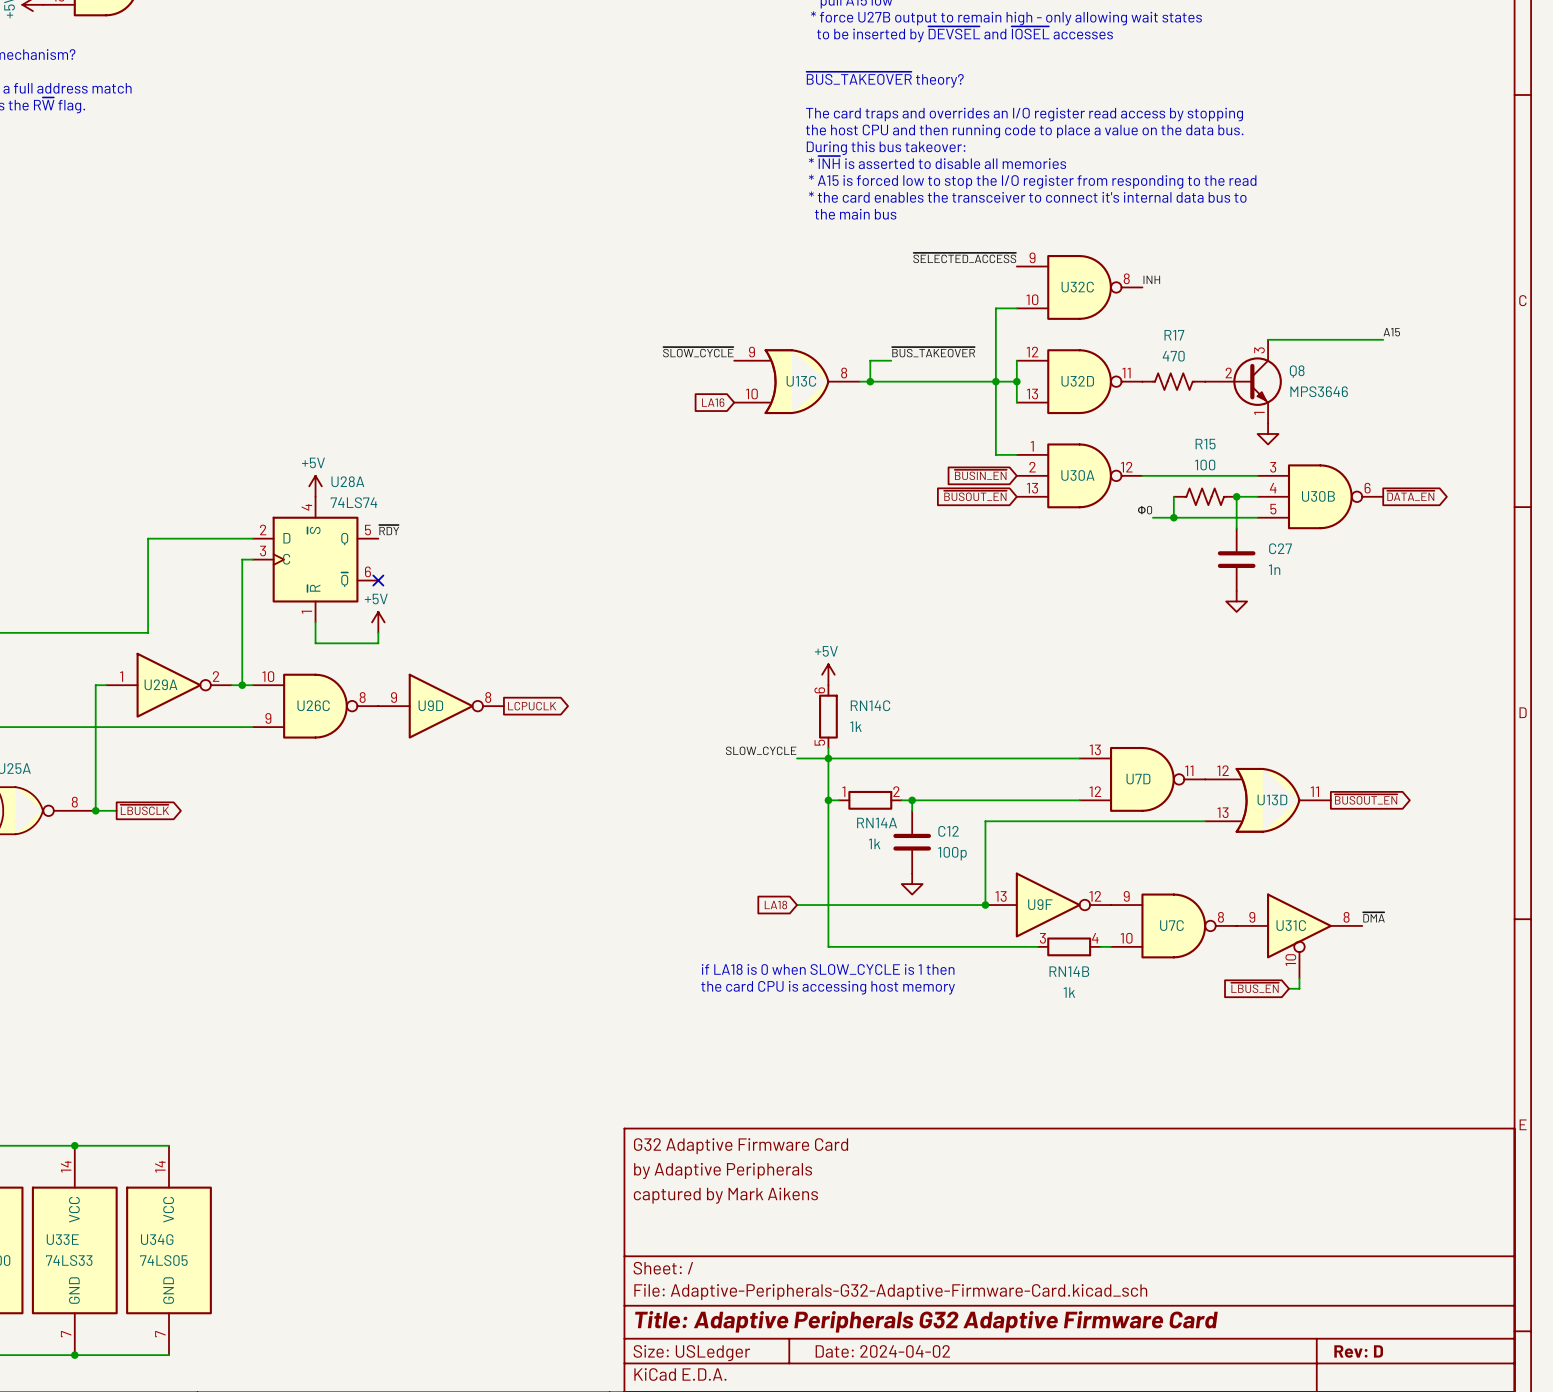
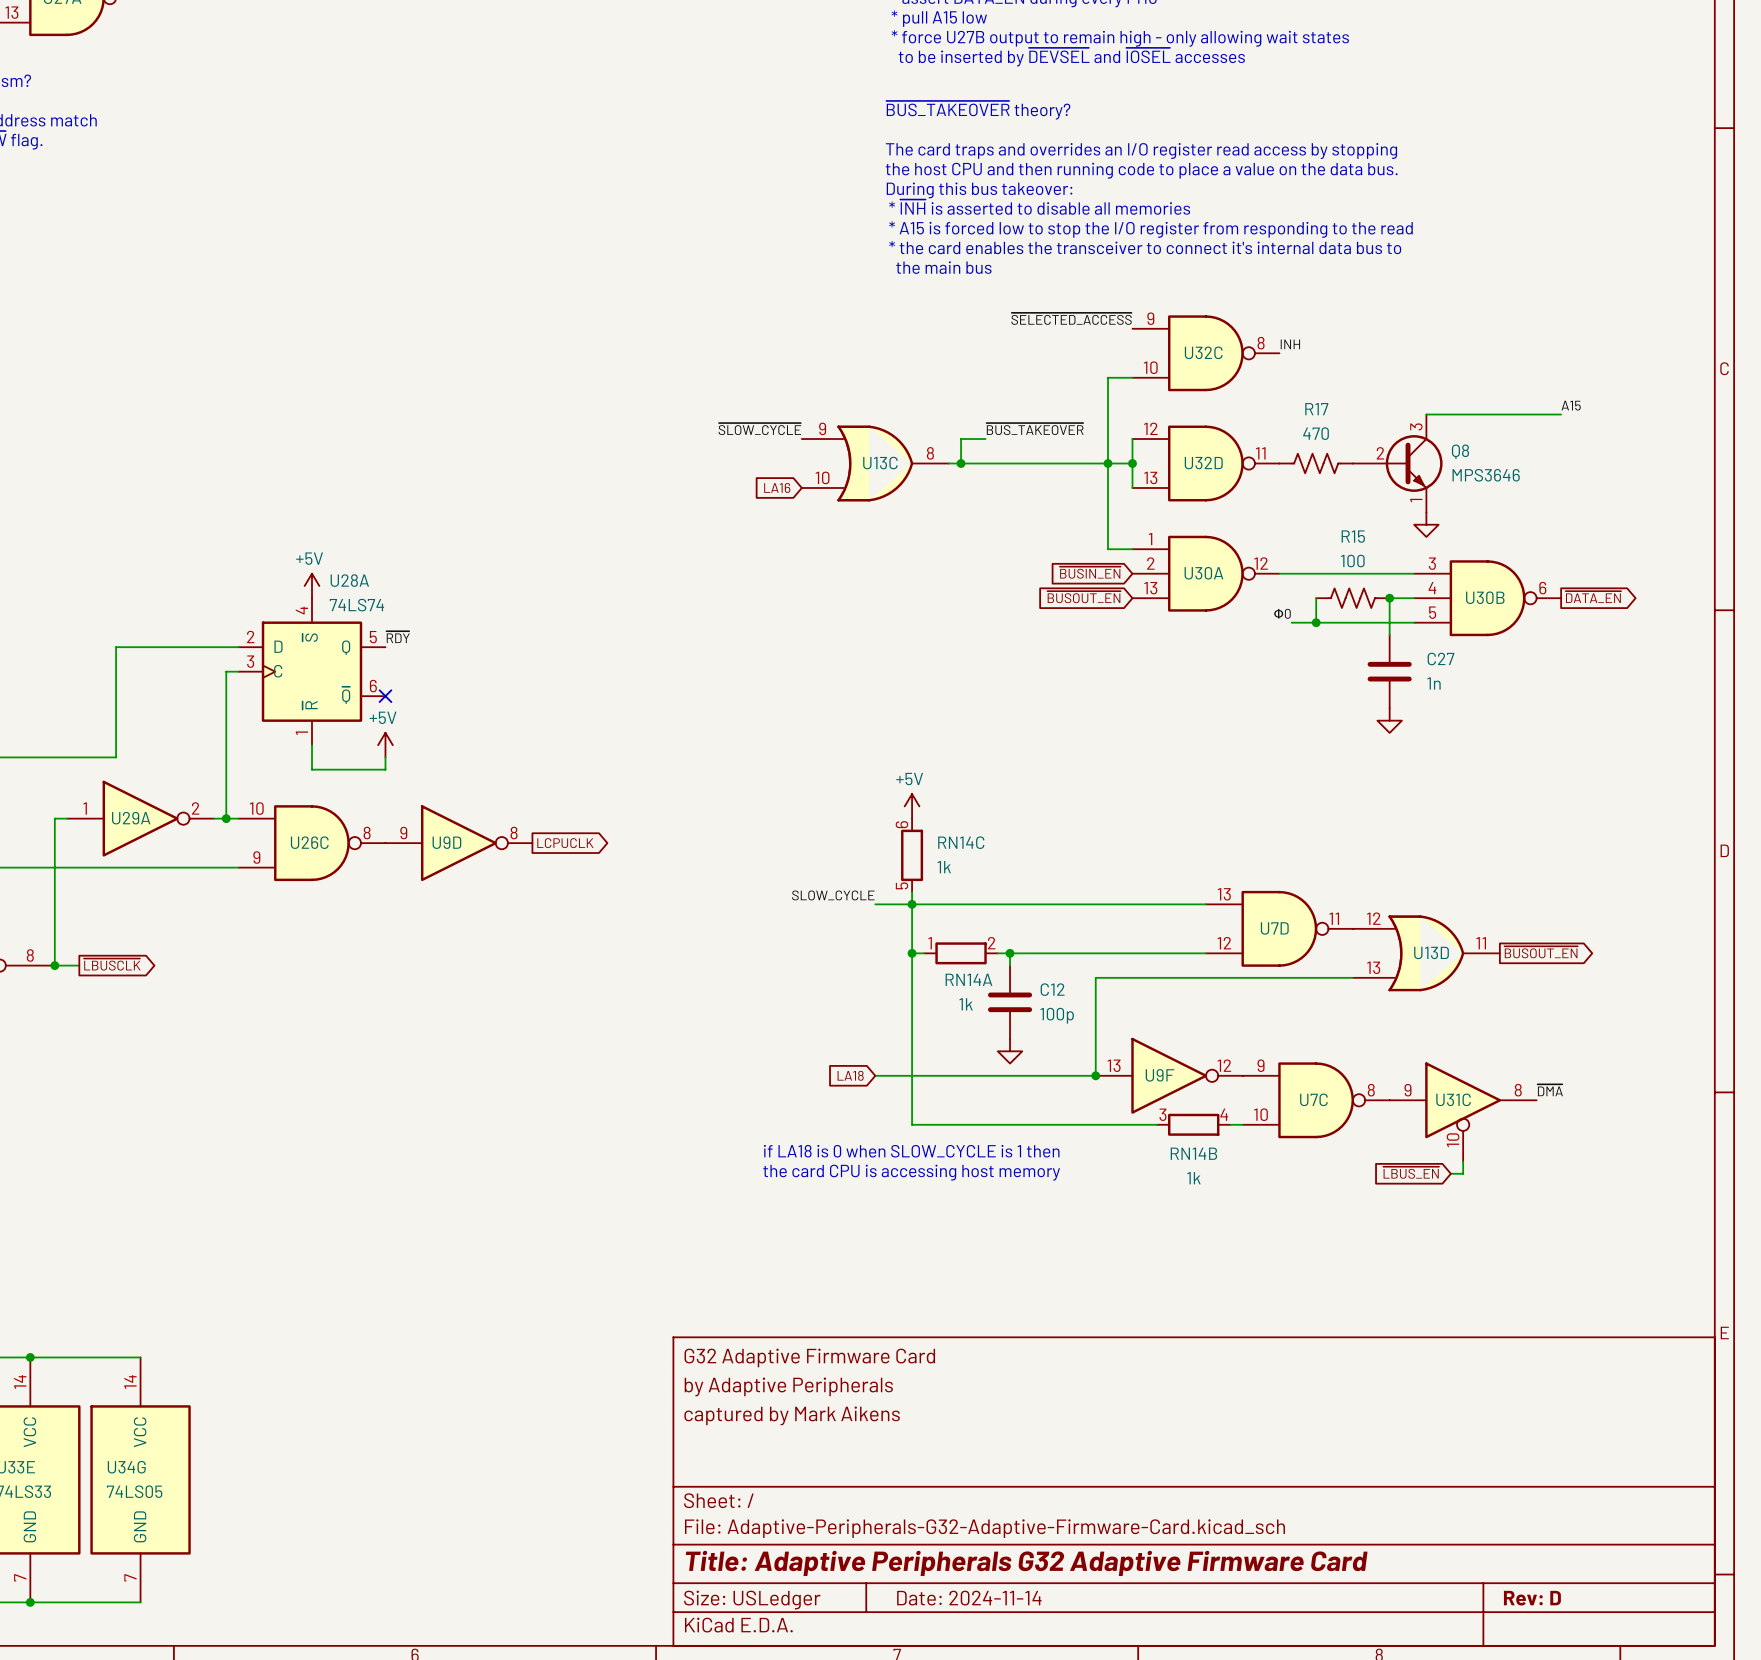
title block: Date: 2024-04-02 (882, 1351) -> Date: 2024-11-14 (969, 1598)

